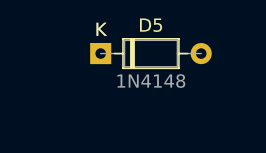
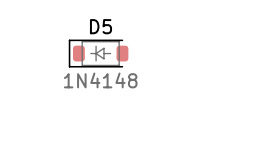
D5 footprint: [90, 37, 212, 70] -> [68, 39, 129, 68]

